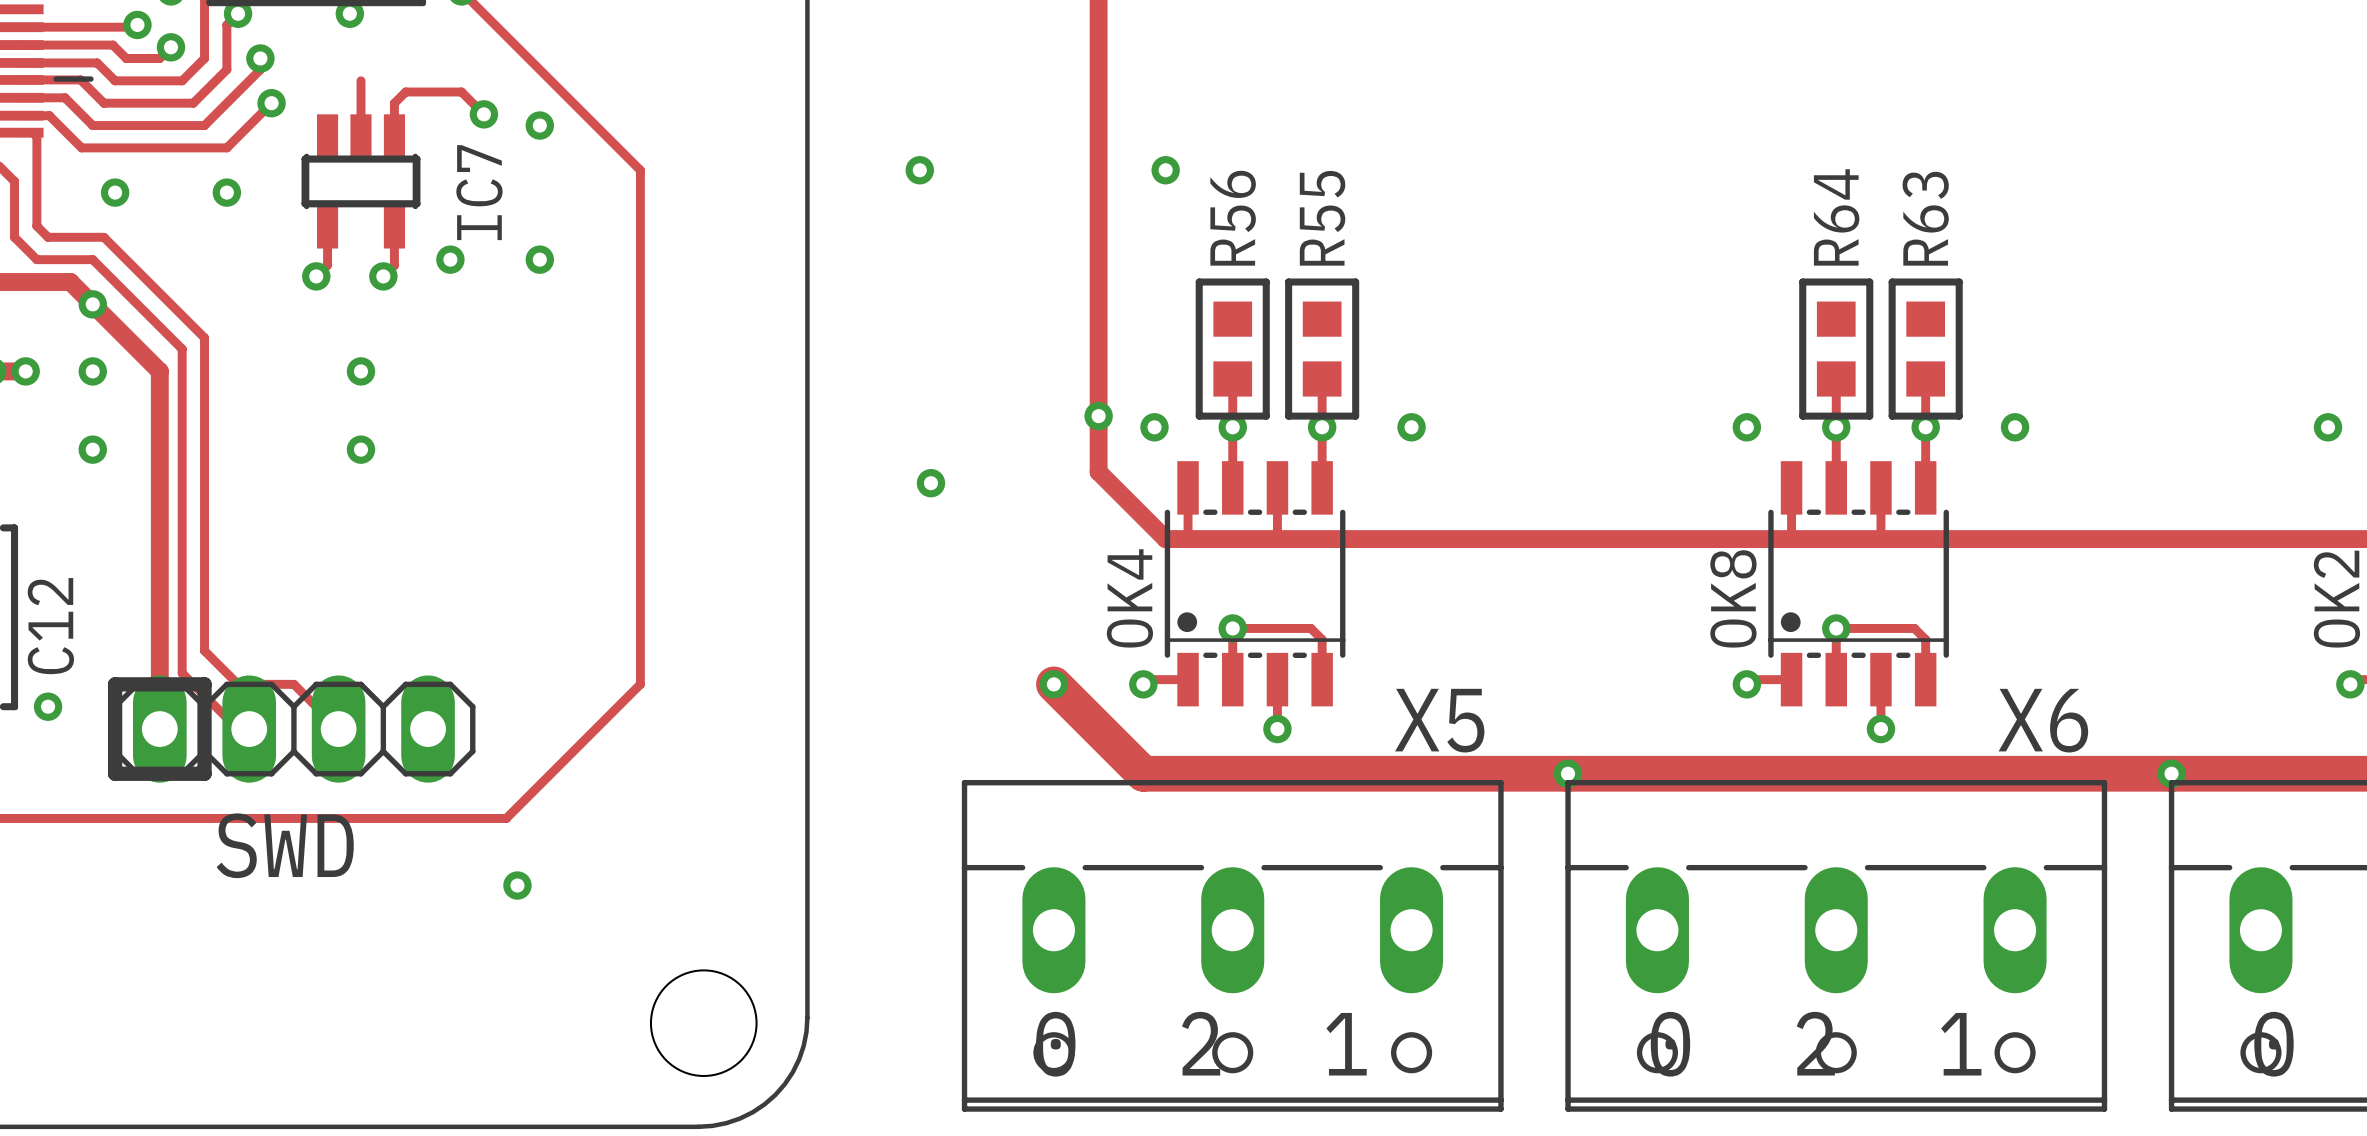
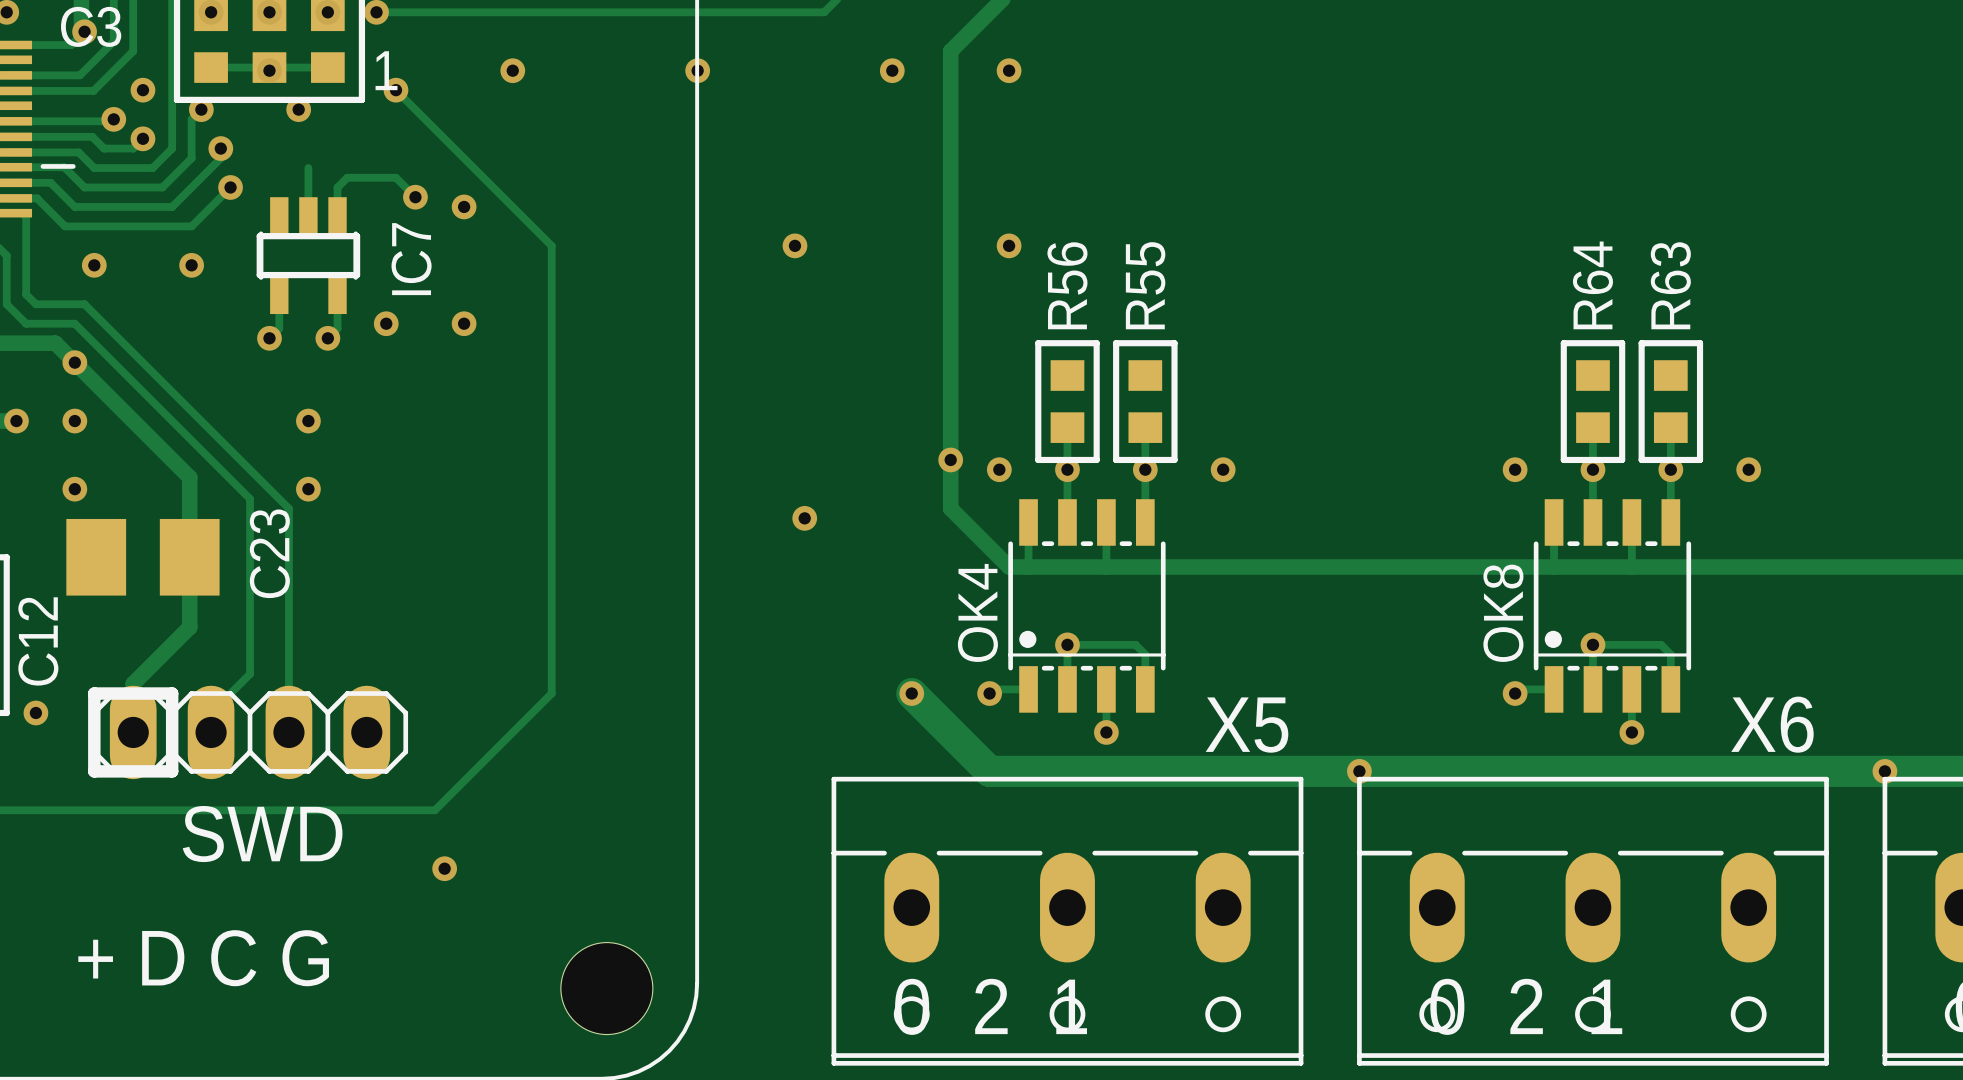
track: (204, 337) (204, 650) (238, 684) (293, 684) (338, 729) -> (172, 391) (288, 508) (288, 732)
track: (182, 349) (182, 673) (238, 729) (249, 729) -> (152, 401) (250, 498) (250, 674) (211, 712) (211, 732)
track: (159, 371) (159, 673) -> (133, 421) (189, 477) (189, 627) (133, 683)
C23: none -> (142, 557)
text: none -> + D C G (203, 958)

